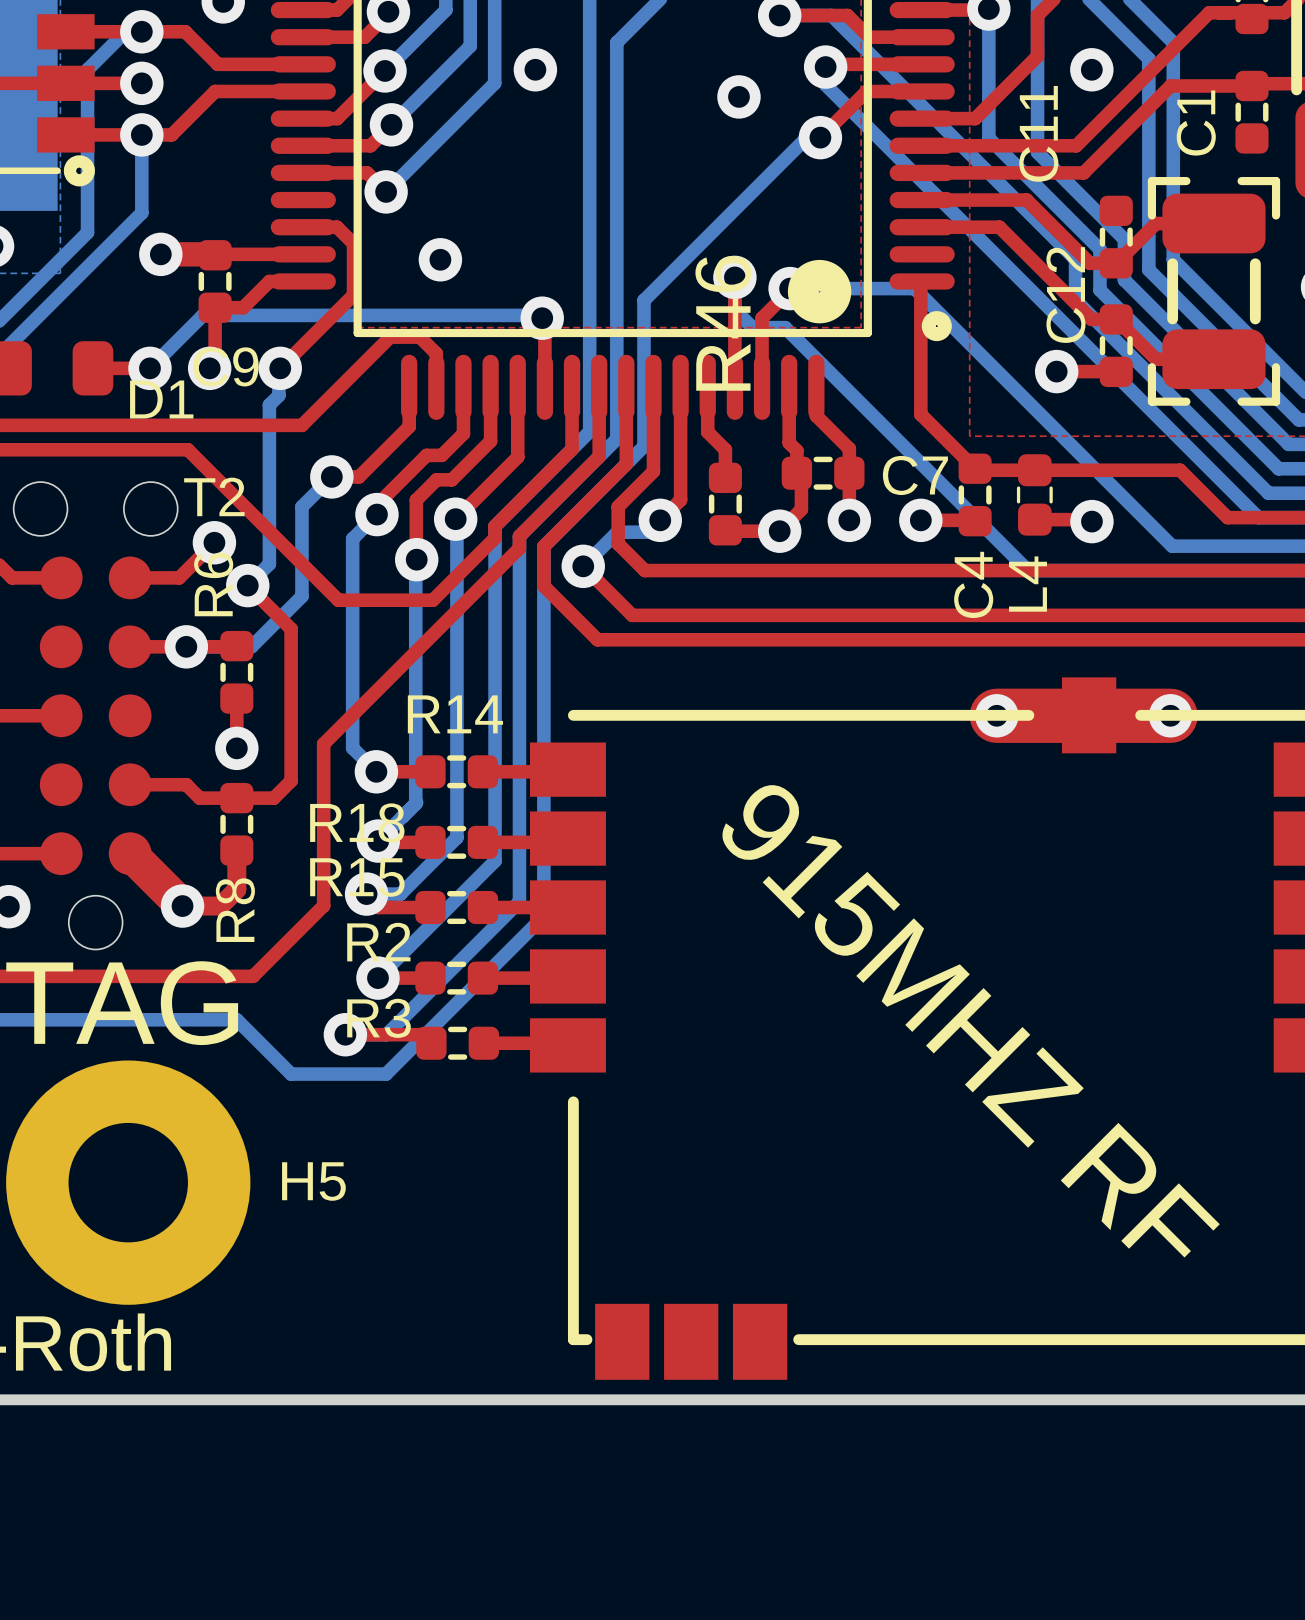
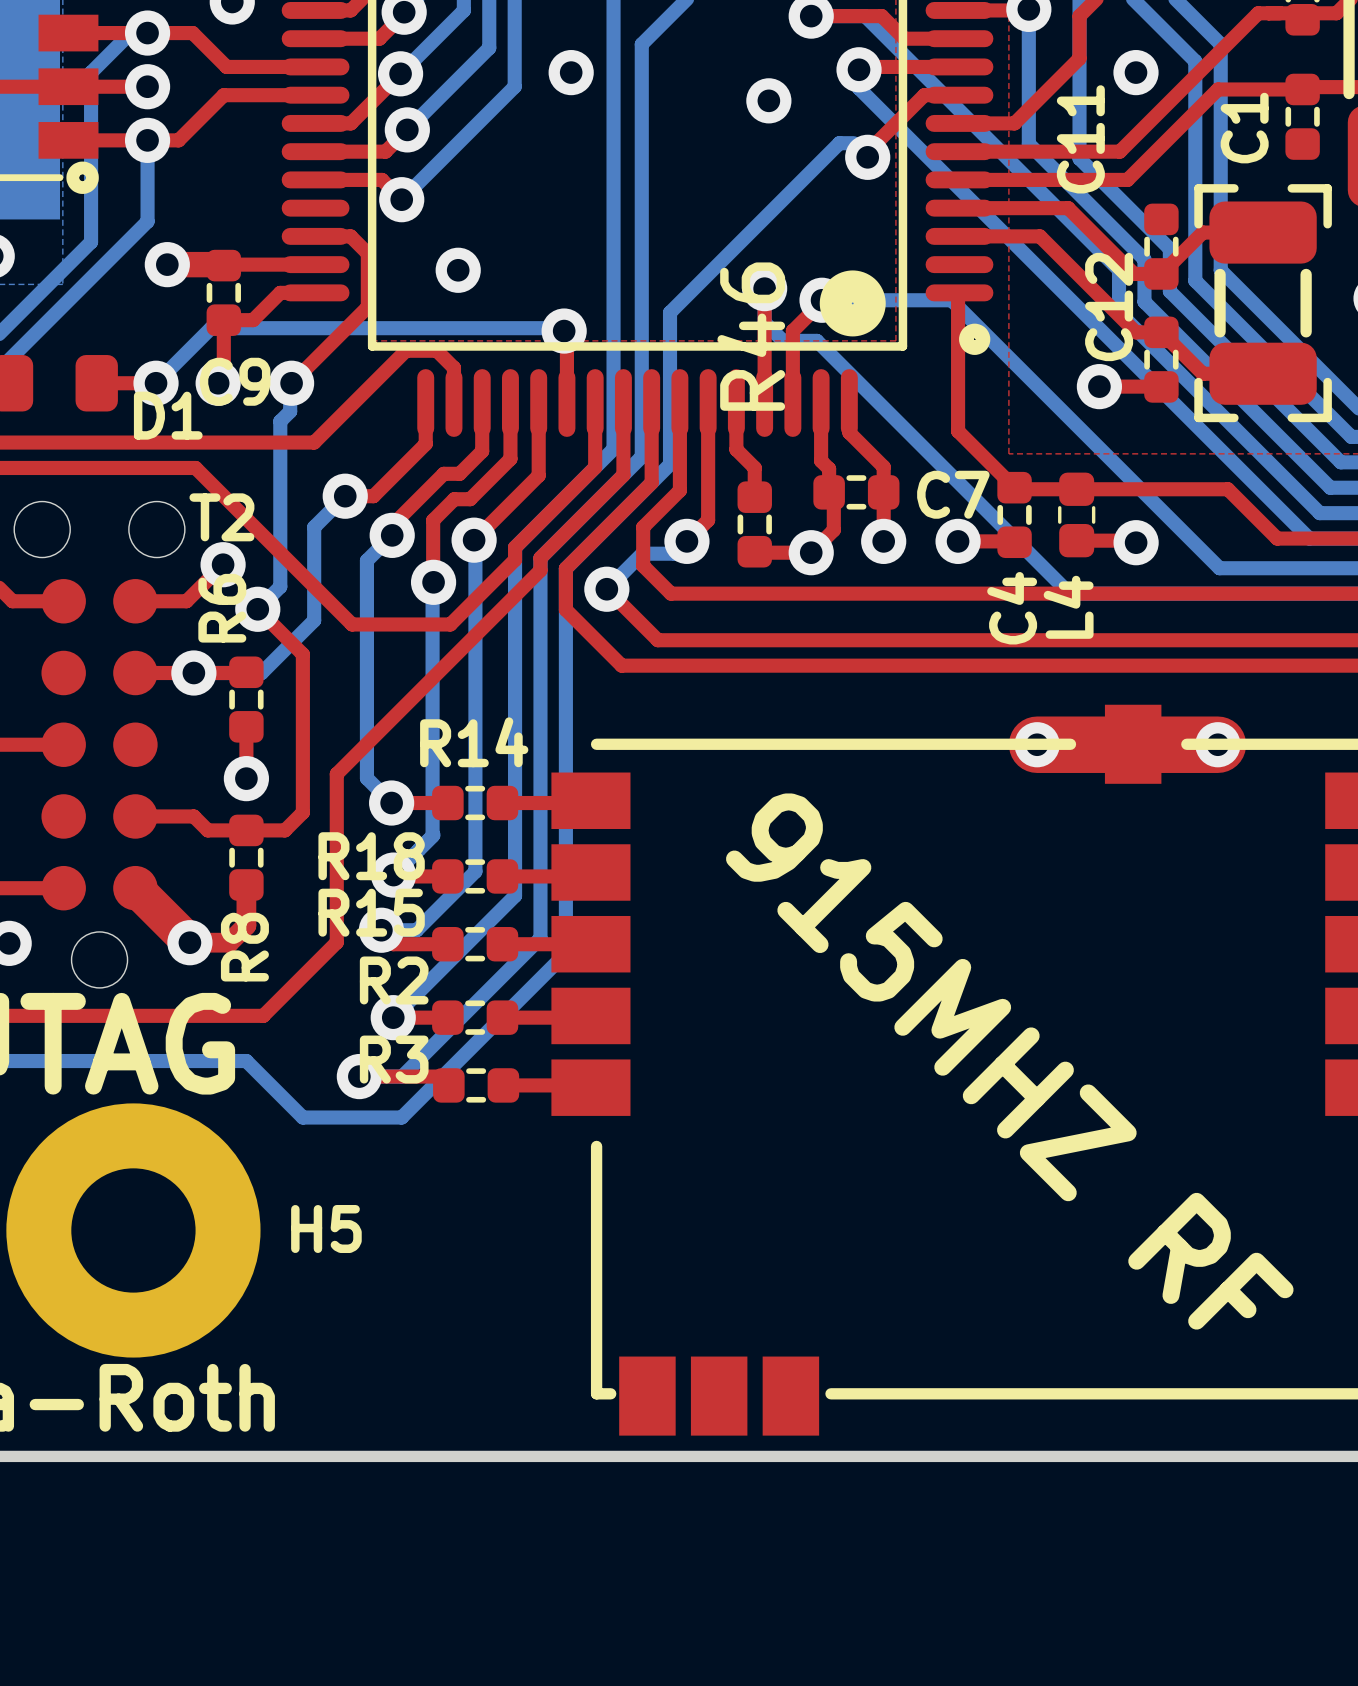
via position: (535, 69) -> (571, 72)
top track: (888, 91) (866, 91) (820, 137) -> (924, 95) (867, 151) (867, 157)
via position: (820, 137) -> (867, 157)

